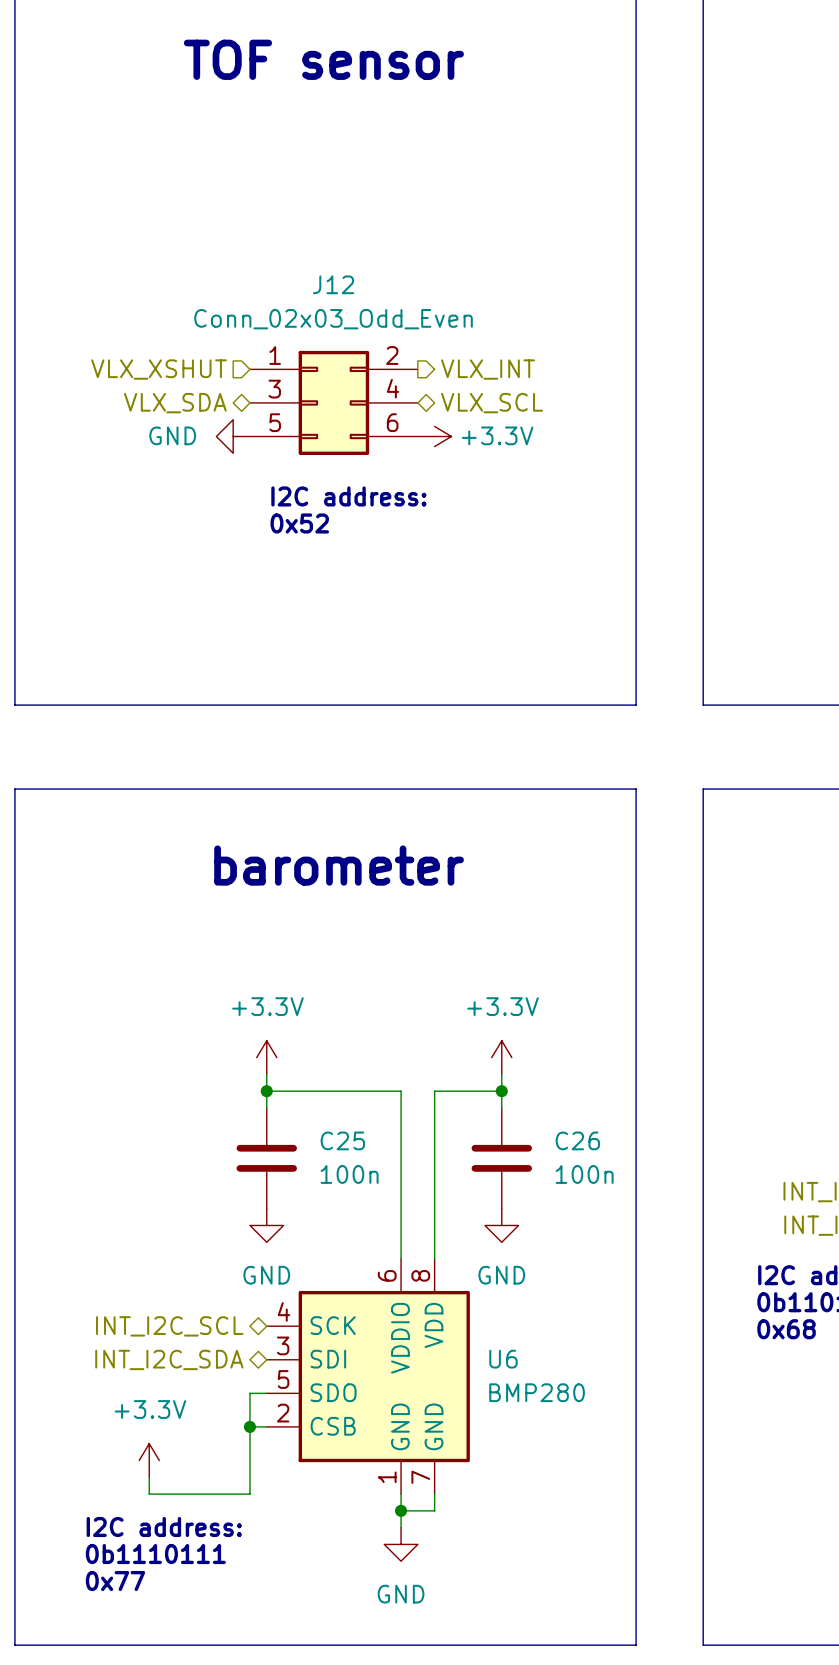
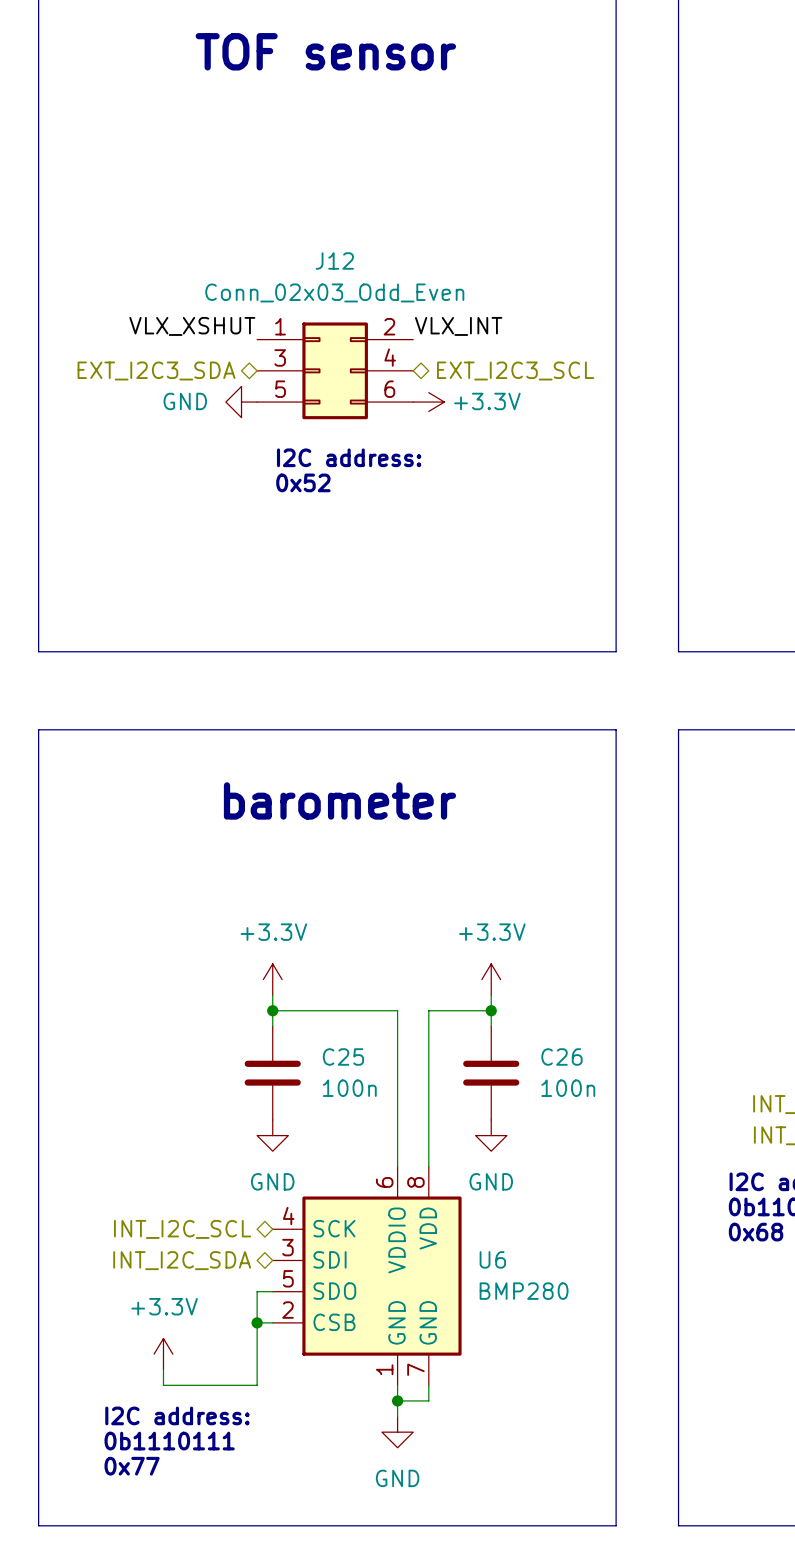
label: none -> VLX_XSHUT (192, 326)
label: none -> VLX_INT (458, 326)
hierarchical label: VLX_XSHUT (158, 369) -> none
hierarchical label: VLX_INT (488, 369) -> none
hierarchical label: VLX_SDA (175, 403) -> EXT_I2C3_SDA (156, 370)
hierarchical label: VLX_SCL (492, 403) -> EXT_I2C3_SCL (515, 370)

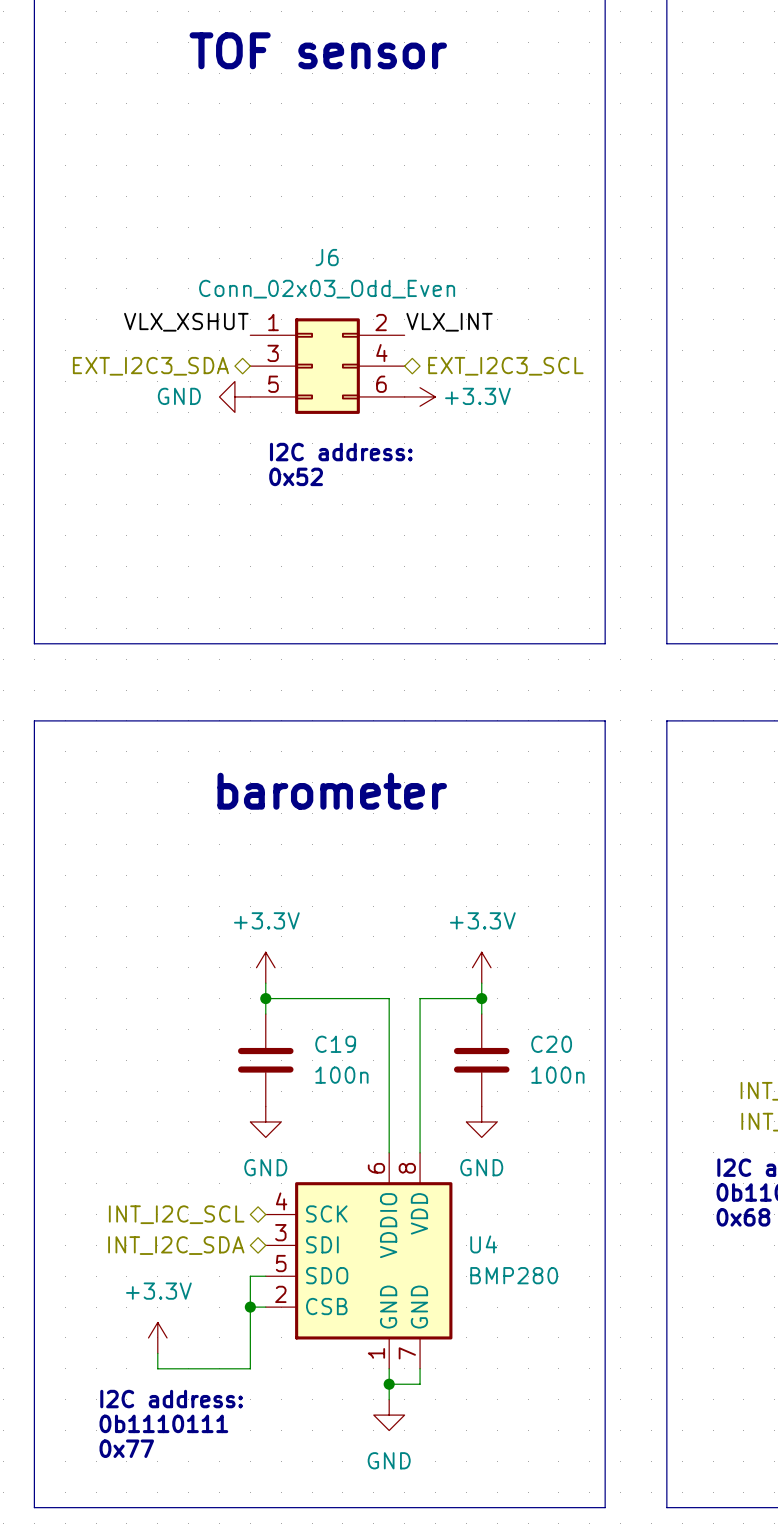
J12 name: J12 (334, 261) -> J6 (327, 257)
C25 name: C25 (343, 1056) -> C19 (335, 1044)
C26 name: C26 (561, 1056) -> C20 (551, 1044)
U6 name: U6 (492, 1259) -> U4 (483, 1244)

